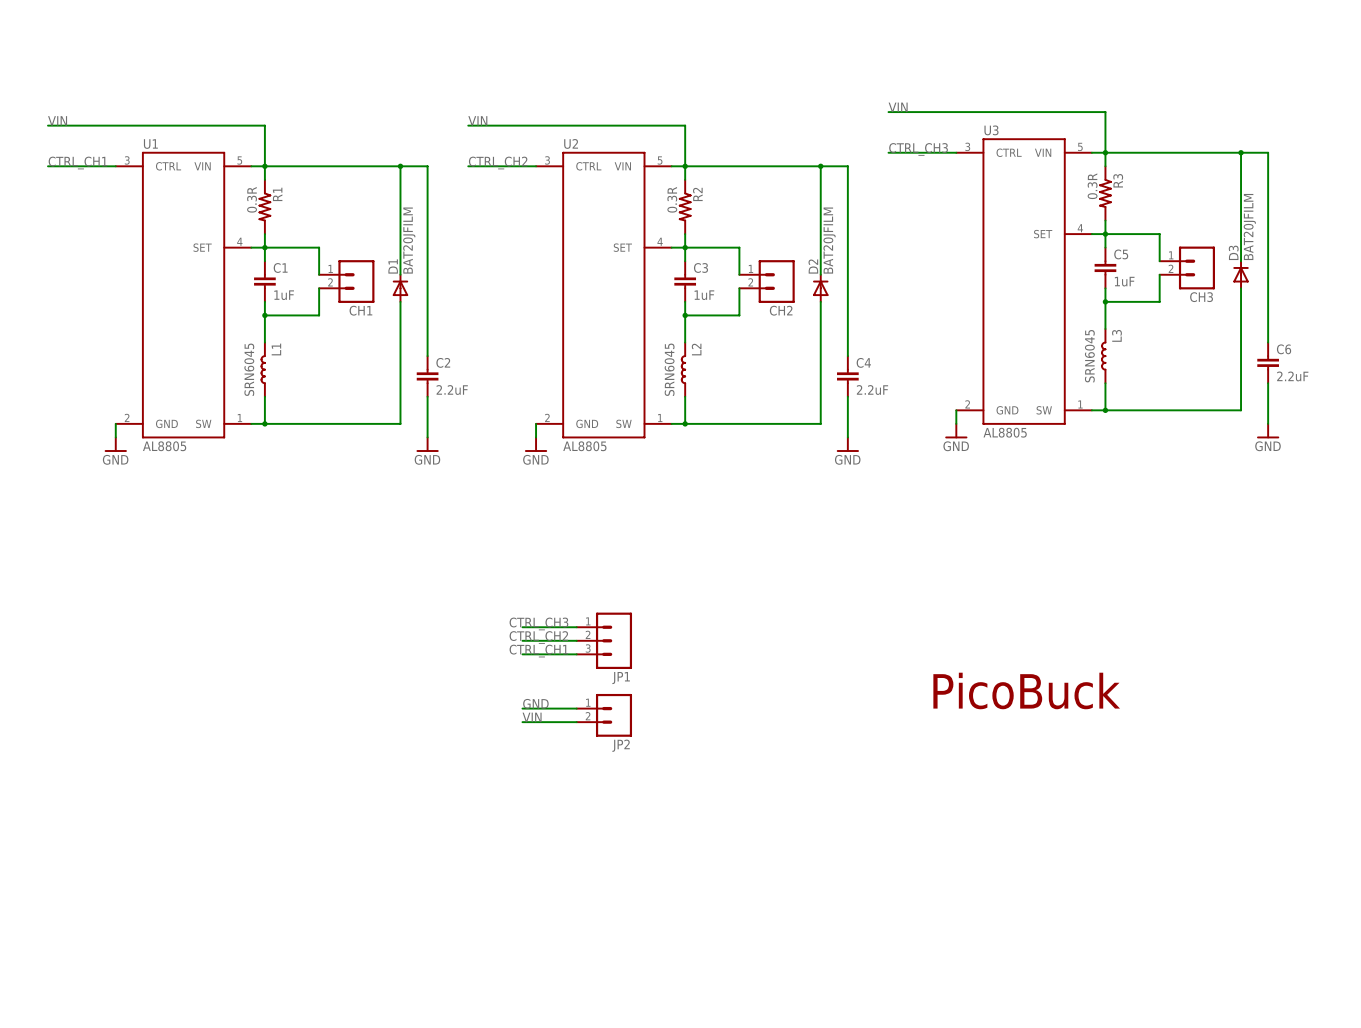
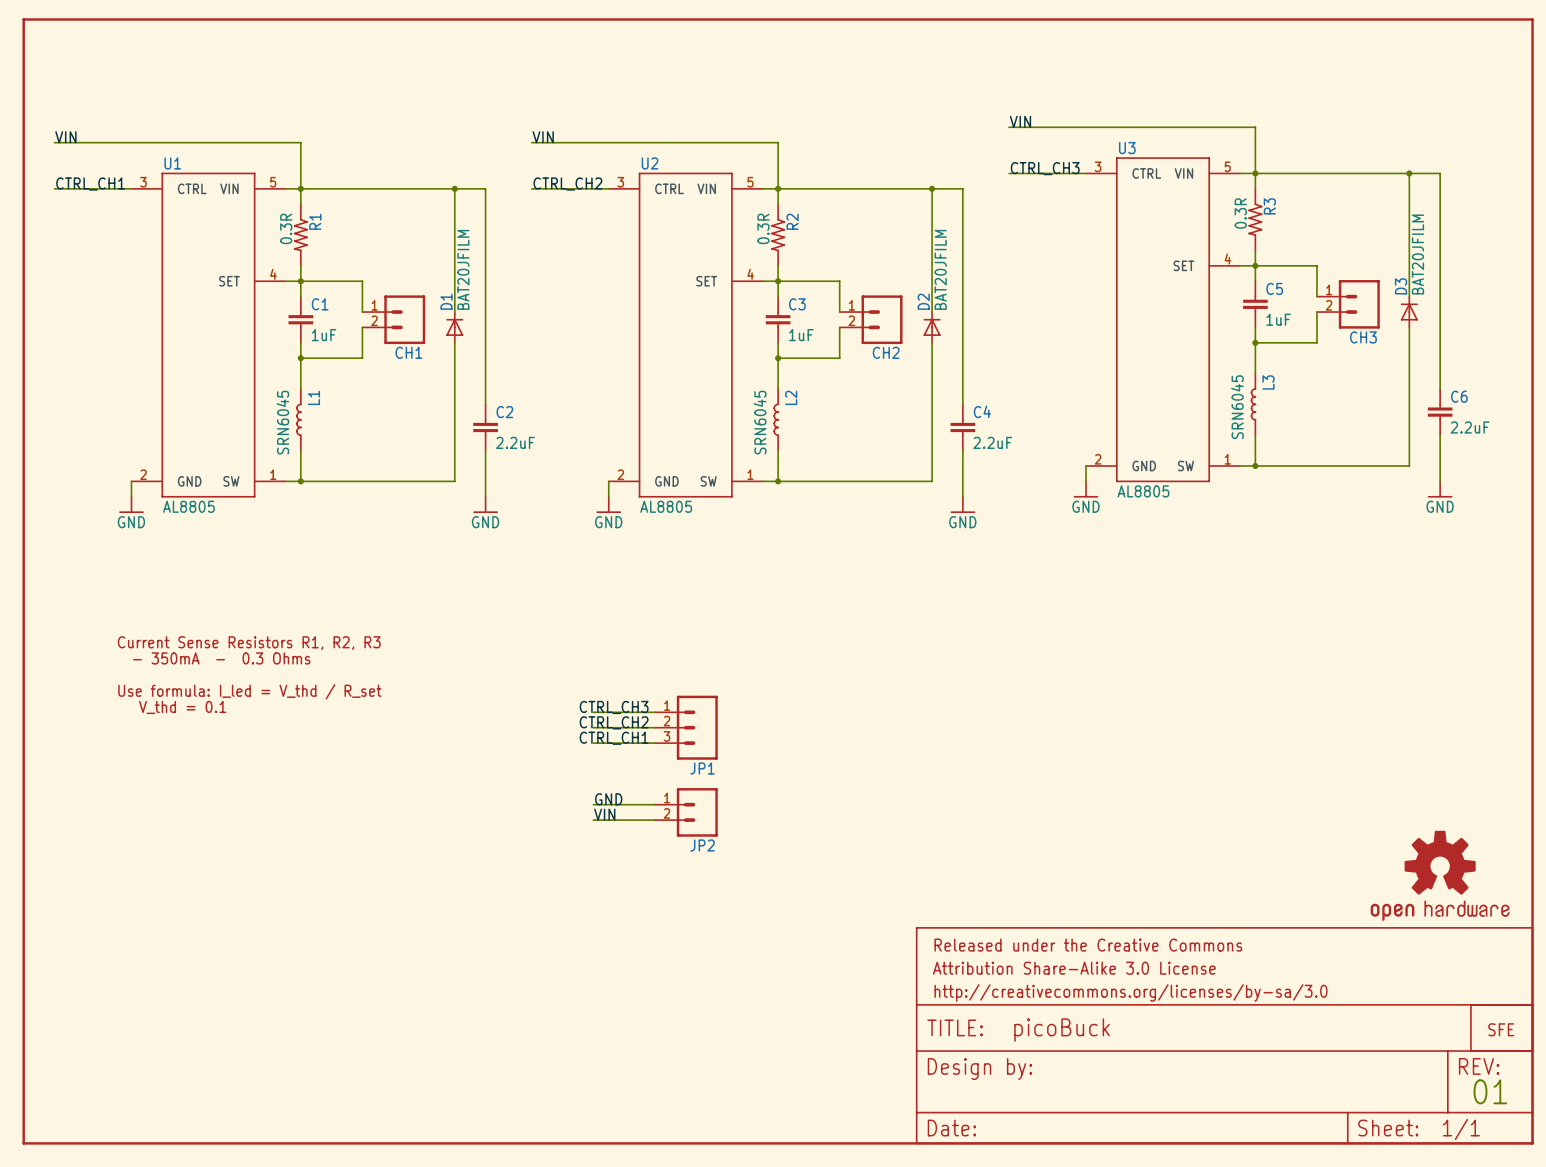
part: none -> (778, 581)
text: none -> Current Sense Resistors R1, R2, R3 (249, 643)
text: none -> - 350mA - 0.3 Ohms (221, 658)
text: none -> Use formula: I_led = V_thd / R_set (249, 691)
text: none -> V_thd = 0.1 (182, 707)
text: PicoBuck (1026, 690) -> none
part: none -> (1440, 875)
part: none -> (1501, 1027)
part: none -> (1224, 1035)
text: none -> 01 (1490, 1091)

